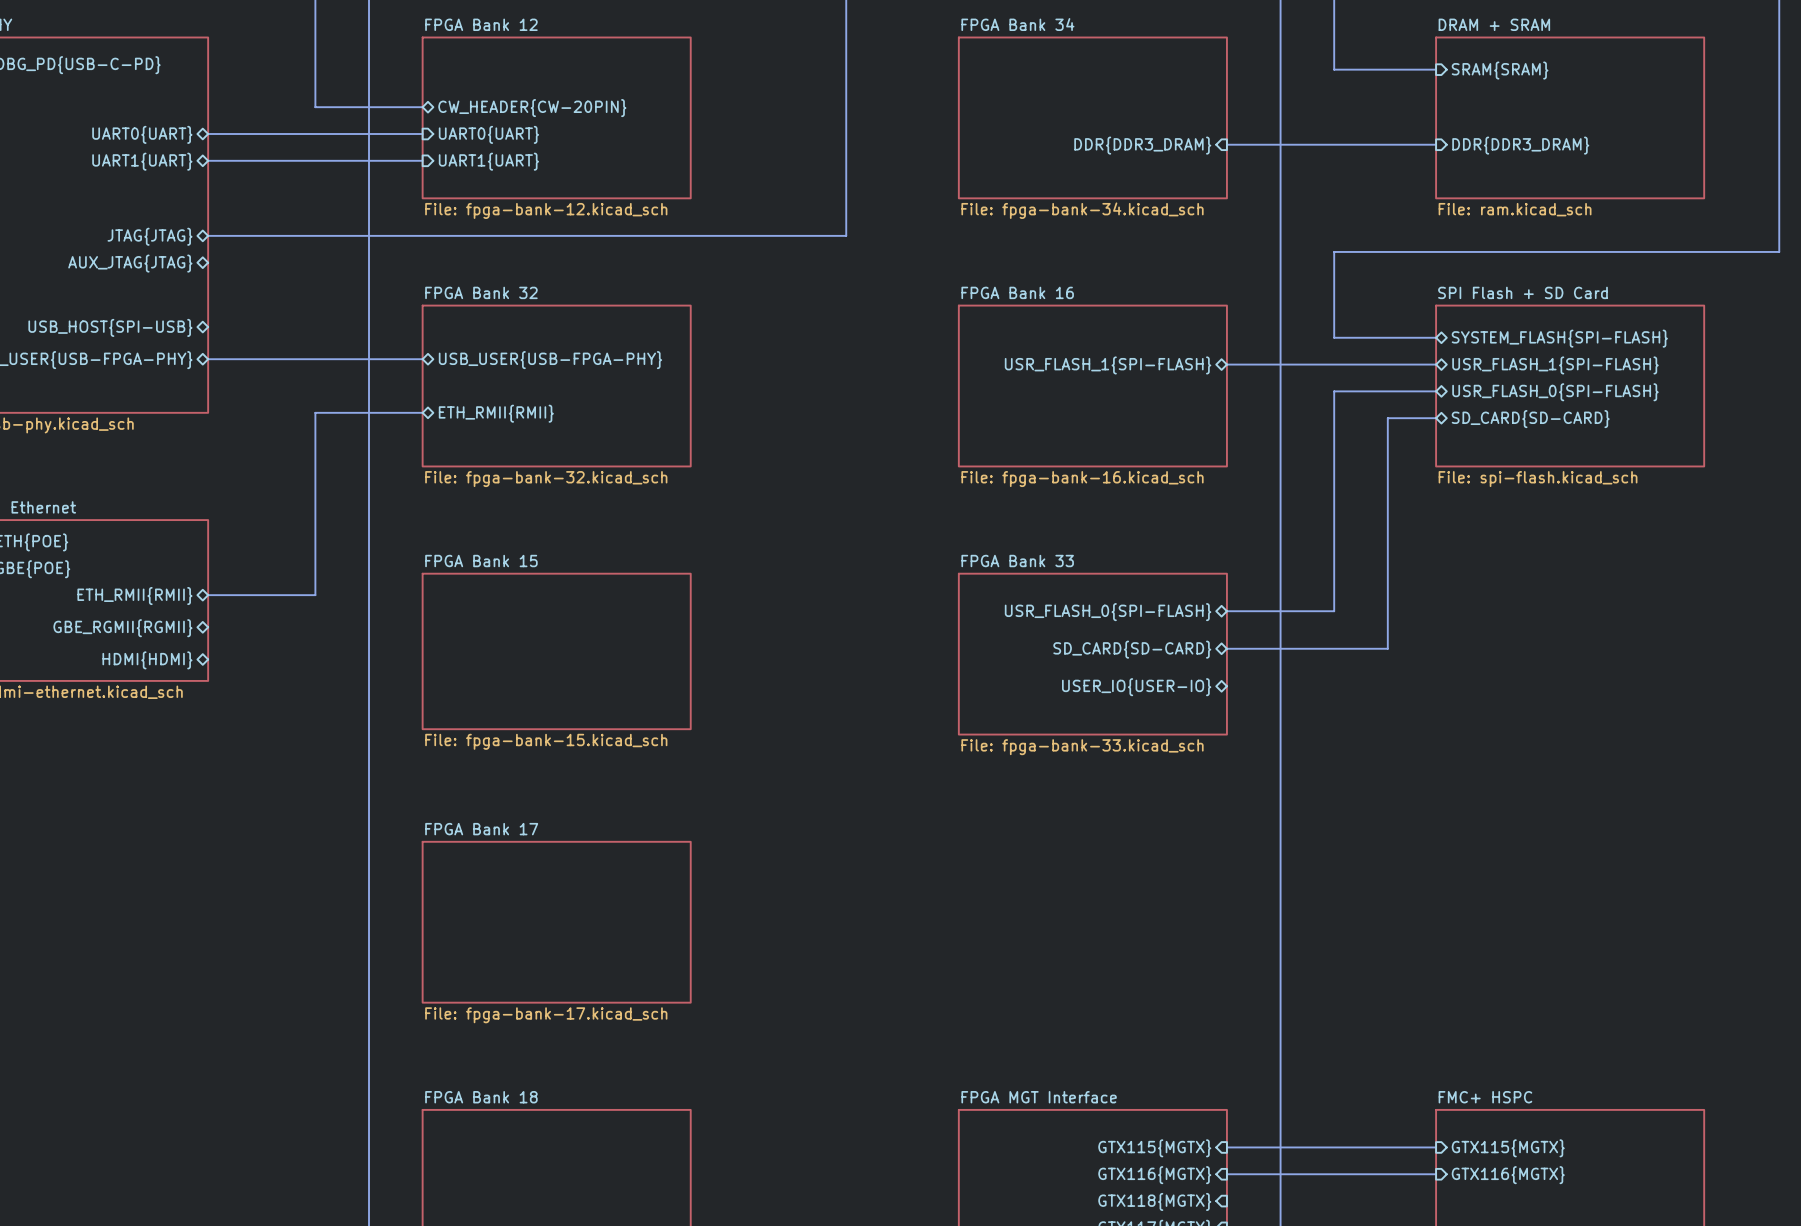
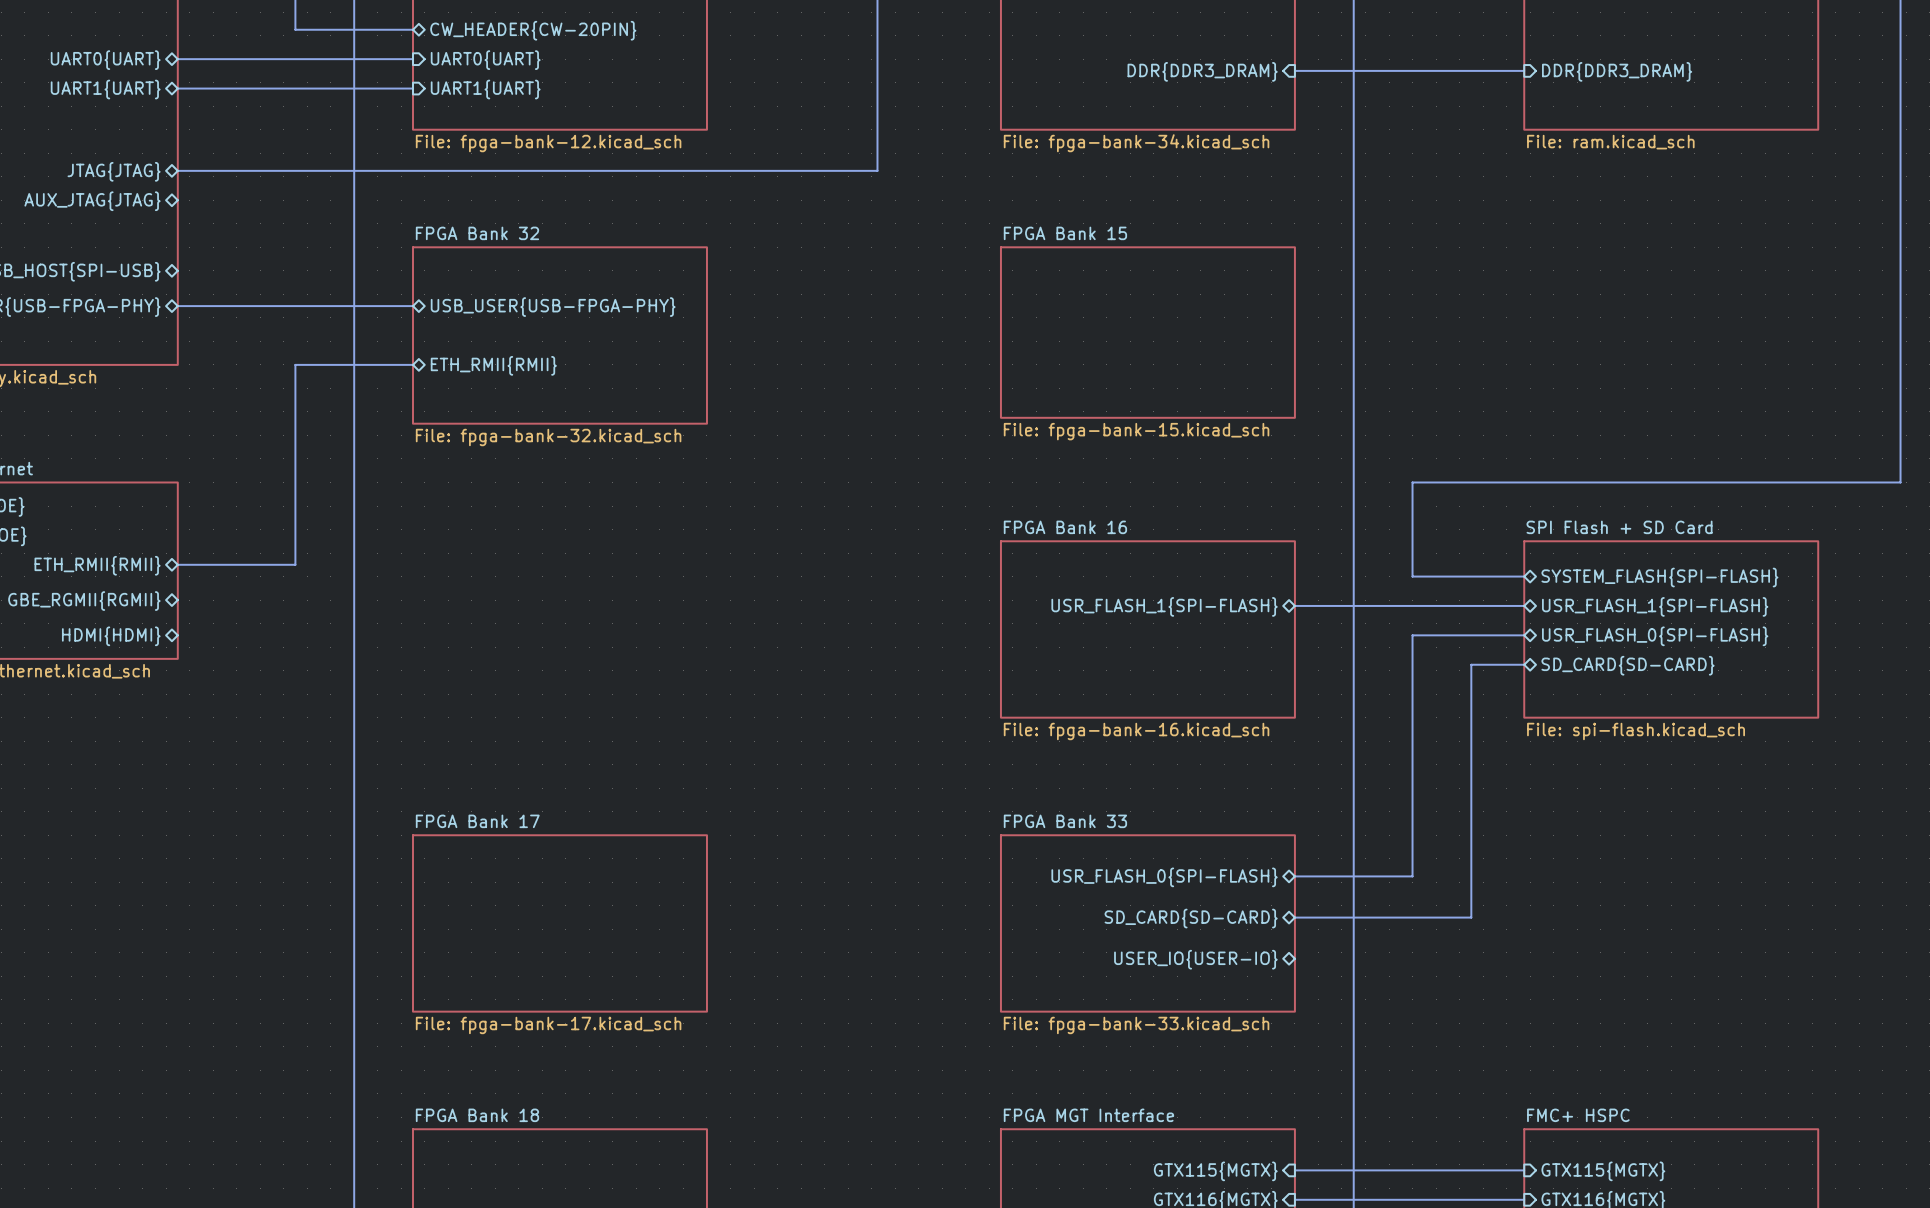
bus: (1779, 251) (1334, 251) (1334, 337) (1436, 337) -> (1900, 188) (1900, 482) (1412, 482)
sheet pin: SYSTEM_FLASH{SPI-FLASH} (1559, 338) -> none
bus: (1226, 364) (1436, 364) -> none
sheet pin: USR_FLASH_1{SPI-FLASH} (1108, 365) -> none
sheet pin: USR_FLASH_1{SPI-FLASH} (1555, 365) -> none
sheet FPGA Bank 16: File: fpga-bank-16.kicad_sch (1092, 386) -> none
sheet SPI Flash + SD Card: File: spi-flash.kicad_sch (1570, 386) -> none
bus: (1436, 391) (1334, 391) (1334, 520) -> none
sheet pin: USR_FLASH_0{SPI-FLASH} (1555, 392) -> none
bus: (1436, 418) (1387, 418) (1387, 648) (1226, 648) -> none
sheet pin: SD_CARD{SD-CARD} (1530, 419) -> none
sheet FPGA Bank 33 name: FPGA Bank 33 (1017, 561) -> FPGA Bank 16 (1065, 527)
bus: (1334, 605) (1334, 611) (1226, 611) -> (1412, 576) (1524, 576)
sheet pin: none -> SYSTEM_FLASH{SPI-FLASH} (1659, 577)
sheet pin: USR_FLASH_0{SPI-FLASH} (1108, 612) -> USR_FLASH_1{SPI-FLASH} (1164, 606)
bus: none -> (1294, 605) (1524, 605)
sheet pin: none -> USR_FLASH_1{SPI-FLASH} (1655, 606)
sheet pin: SD_CARD{SD-CARD} (1132, 649) -> none
sheet FPGA Bank 15 position: (556, 651) -> (1147, 332)
sheet SPI Flash + SD Card: none -> File: spi-flash.kicad_sch (1671, 629)
bus: none -> (1524, 635) (1412, 635) (1412, 876) (1294, 876)
sheet pin: none -> USR_FLASH_0{SPI-FLASH} (1655, 636)
bus: none -> (1524, 664) (1471, 664) (1471, 917) (1294, 917)
sheet pin: USER_IO{USER-IO} (1136, 687) -> none
sheet pin: none -> SD_CARD{SD-CARD} (1628, 665)
sheet FPGA Bank 33 value: File: fpga-bank-33.kicad_sch (1082, 747) -> File: fpga-bank-16.kicad_sch (1136, 731)
sheet pin: none -> USR_FLASH_0{SPI-FLASH} (1164, 877)
sheet pin: none -> SD_CARD{SD-CARD} (1191, 918)
sheet FPGA Bank 33: none -> File: fpga-bank-33.kicad_sch (1147, 923)
sheet pin: none -> USER_IO{USER-IO} (1195, 959)

